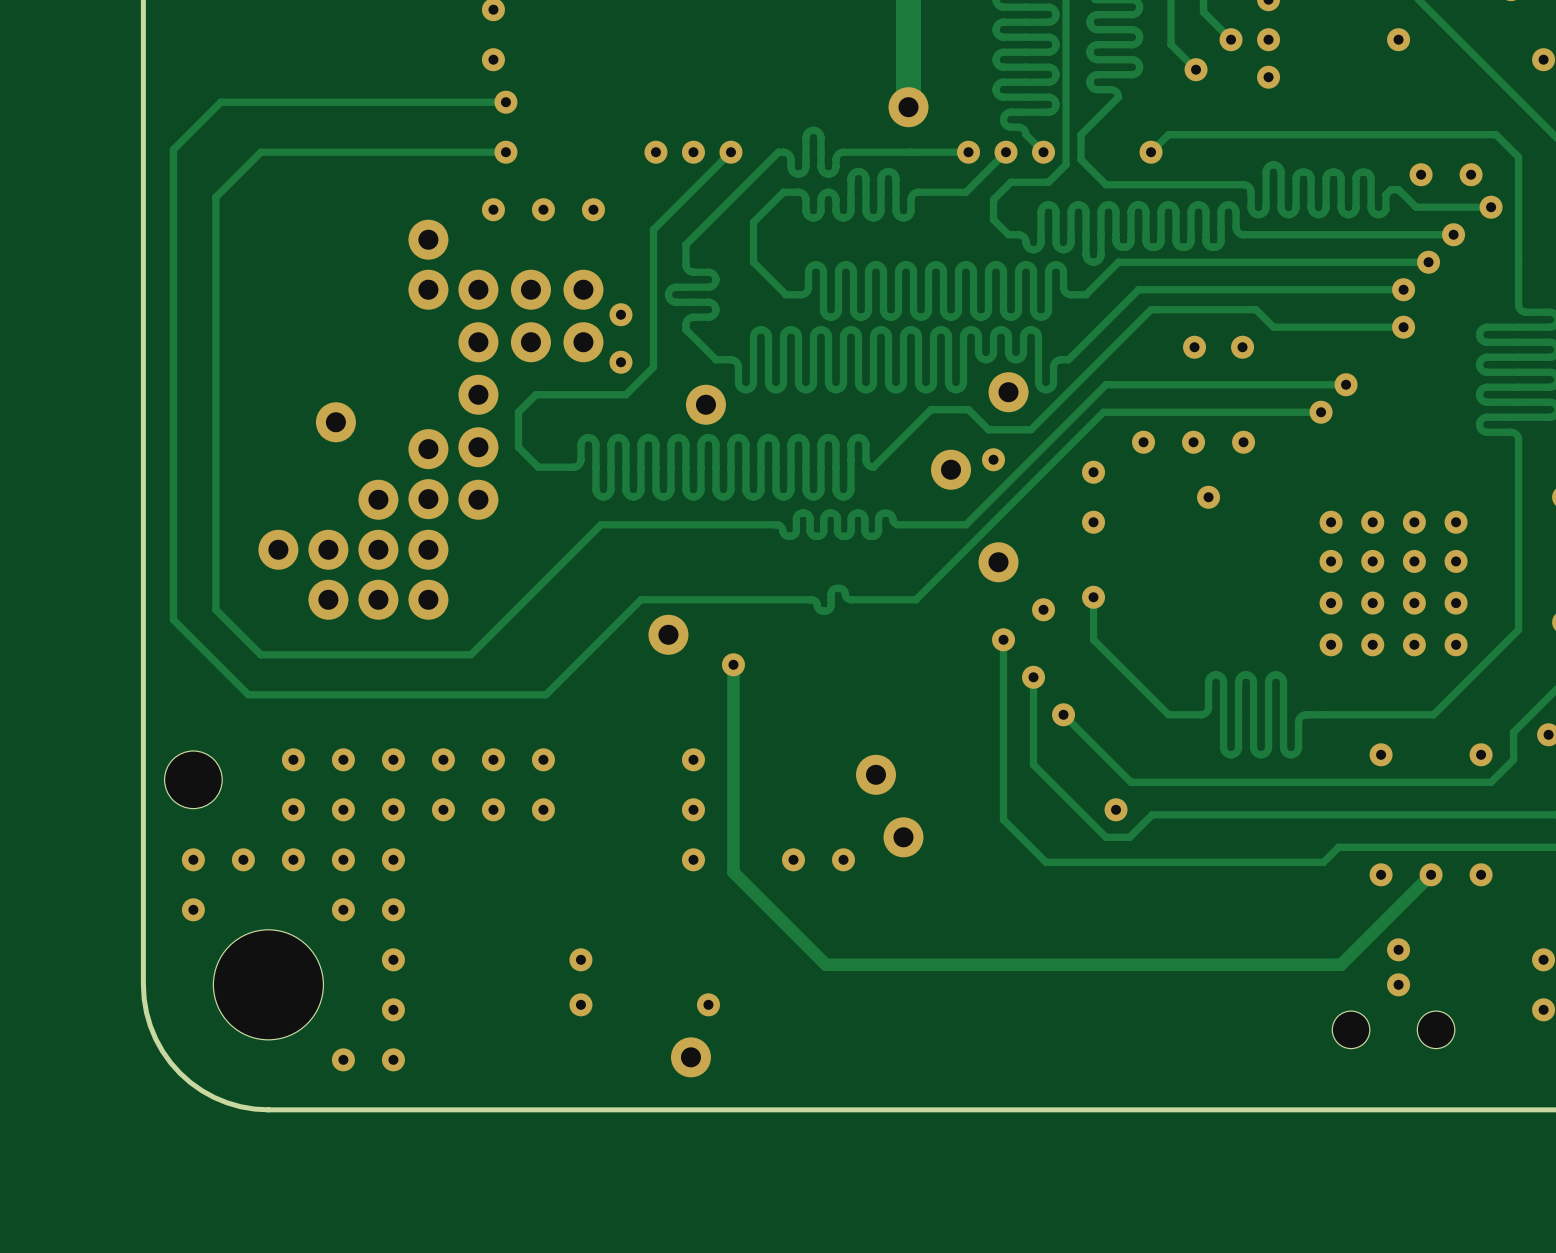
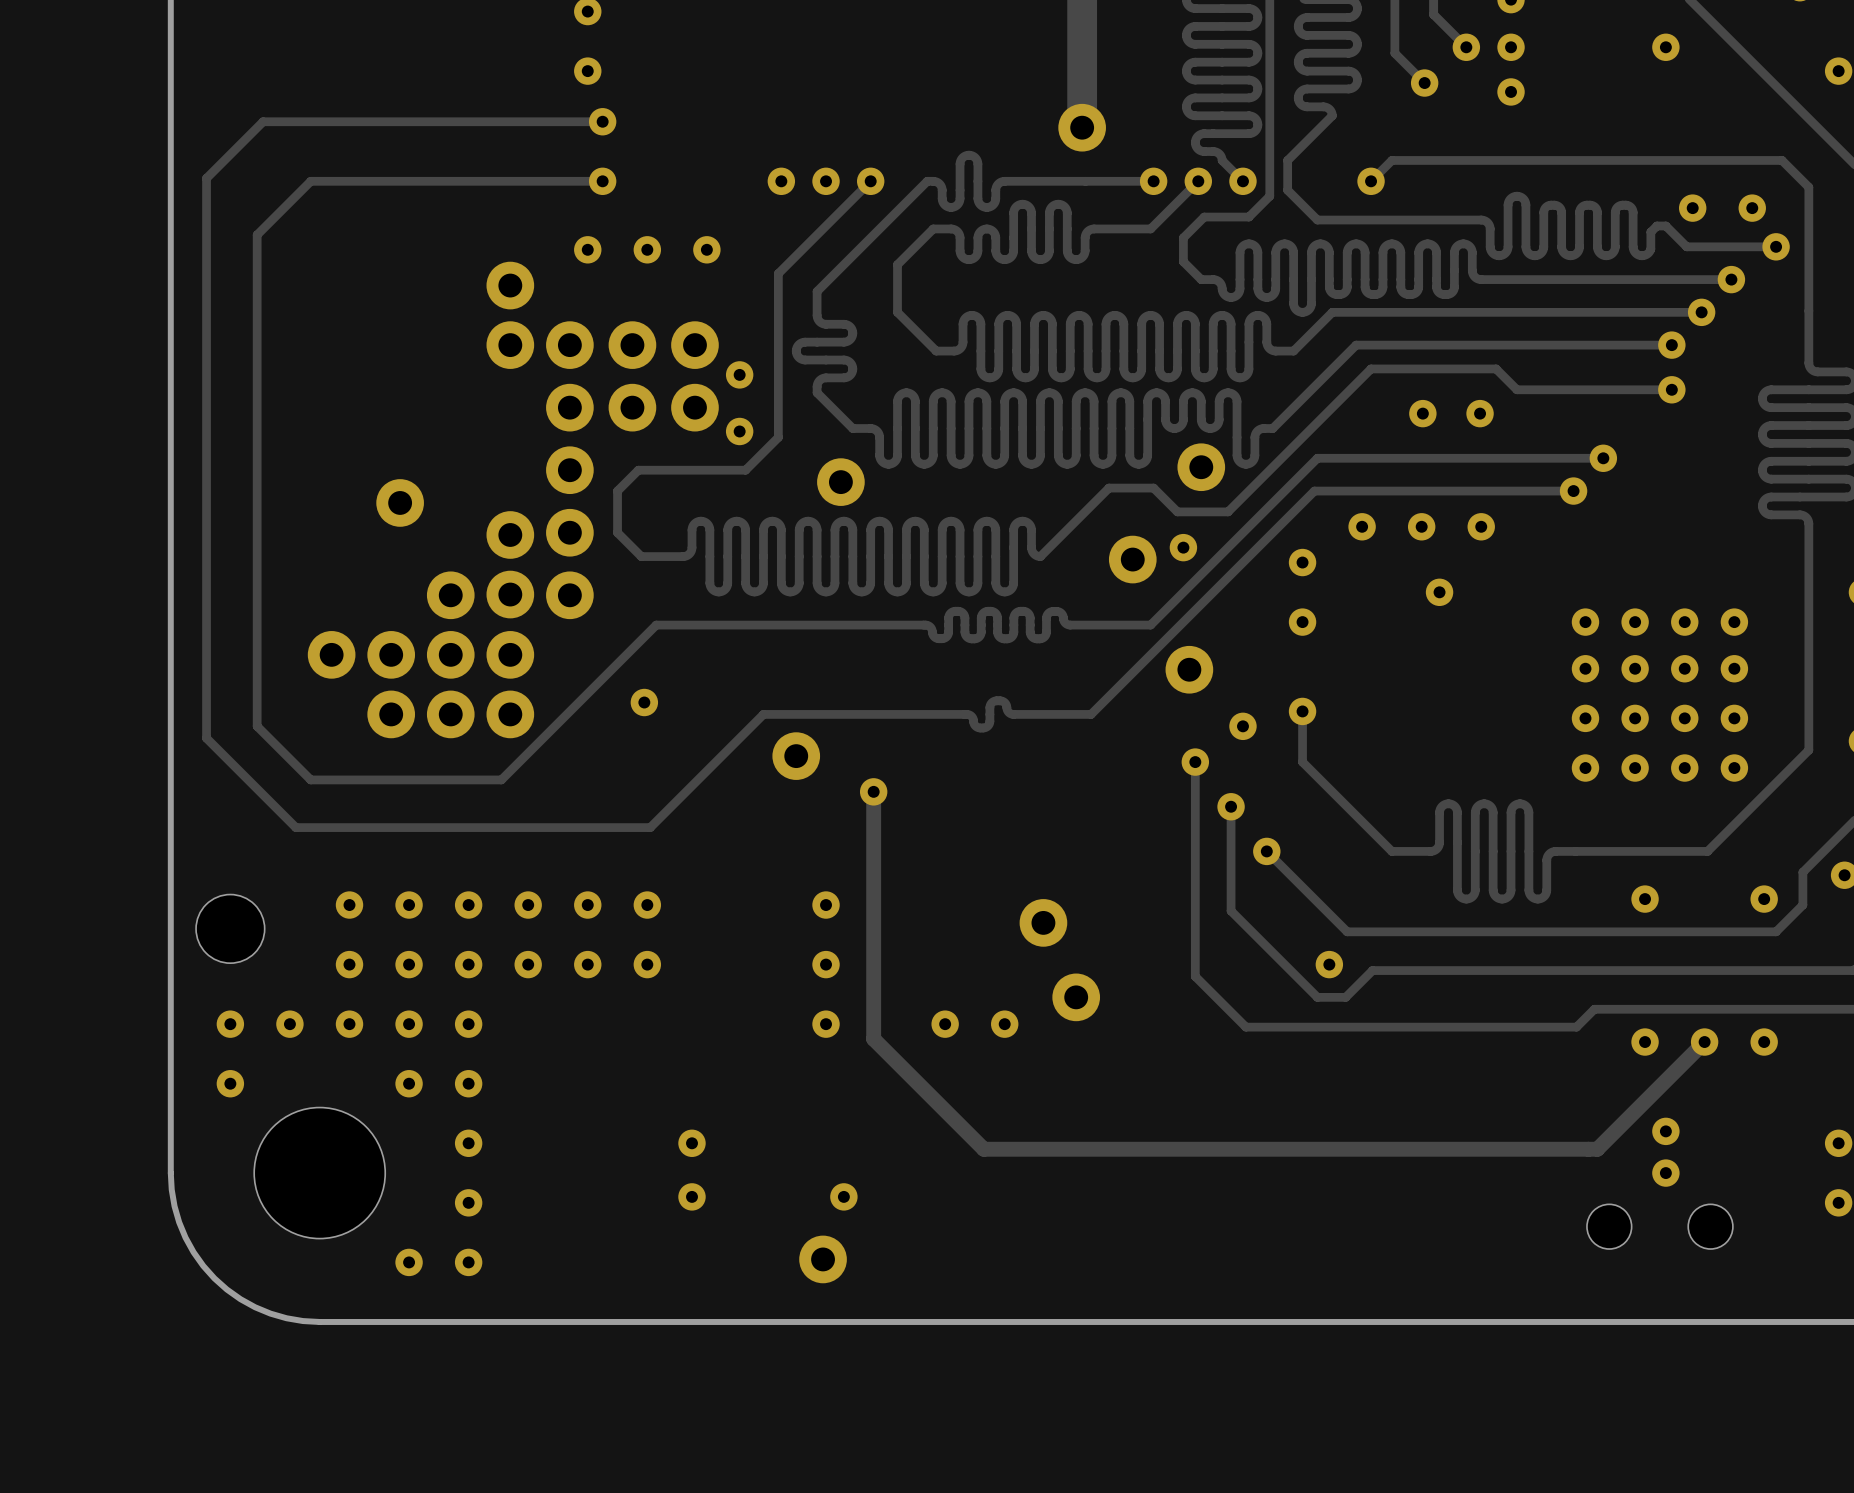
track: (600, 524) (470, 654) (420, 654) -> (715, 625) (656, 625) (501, 779)
via: none -> (644, 702)

